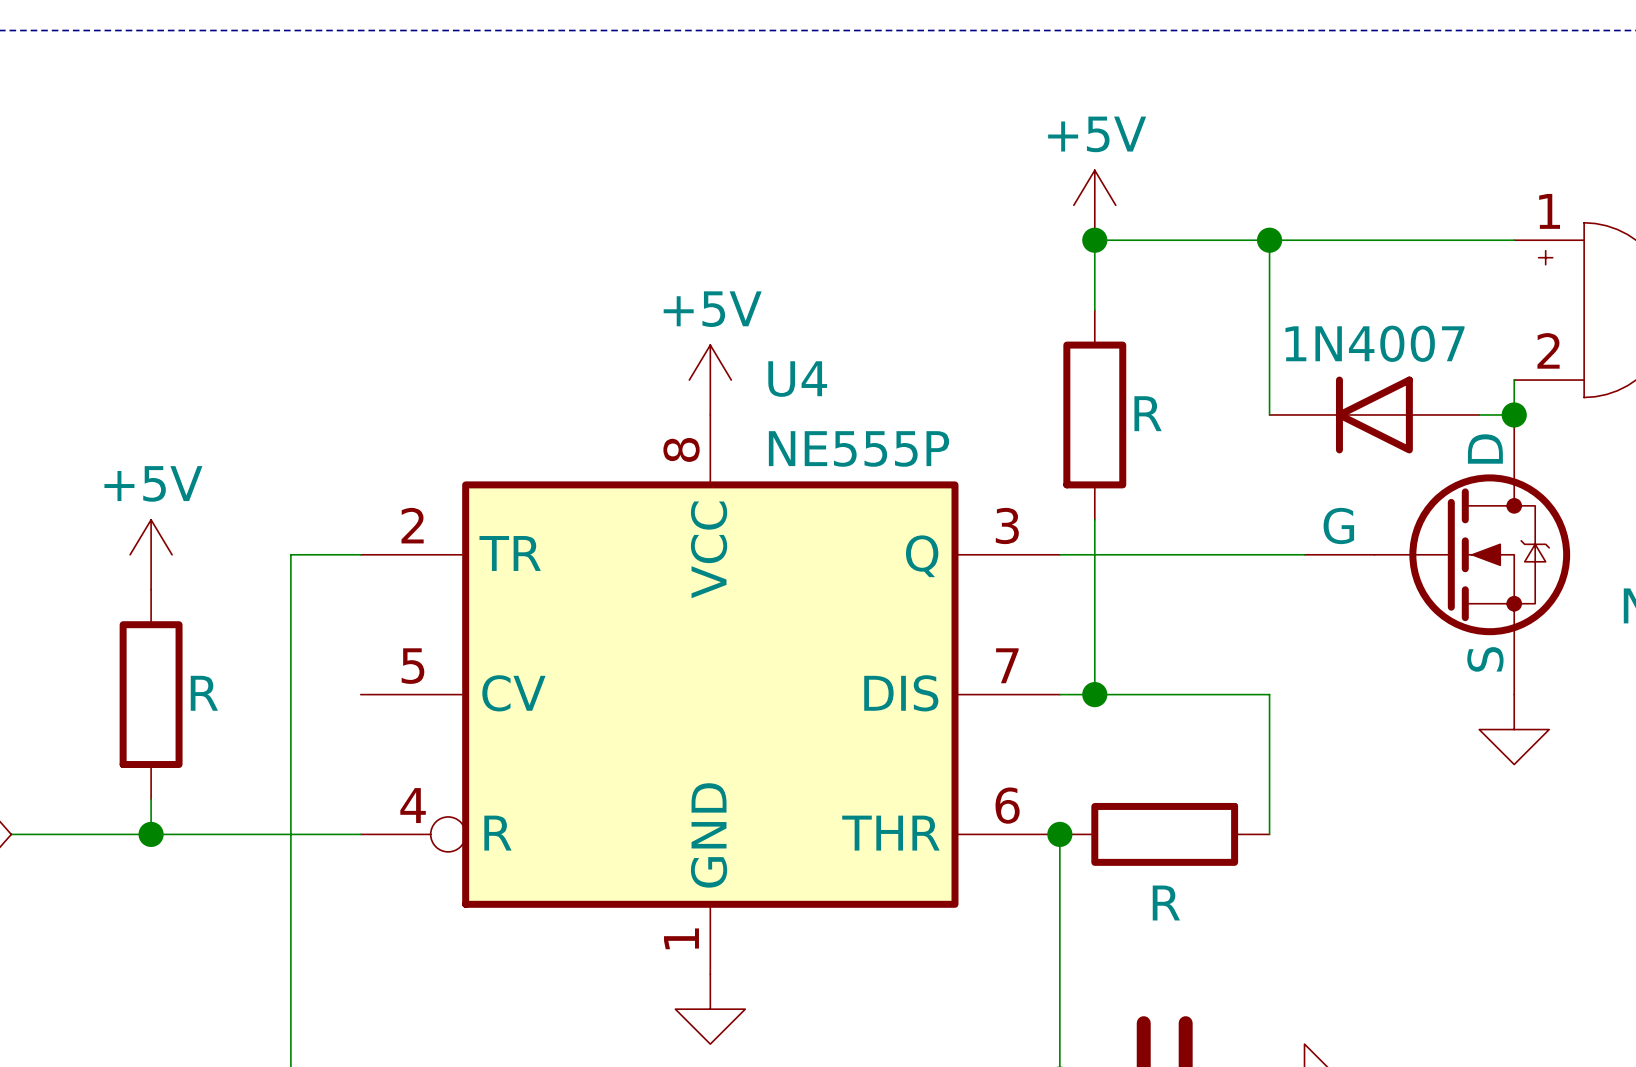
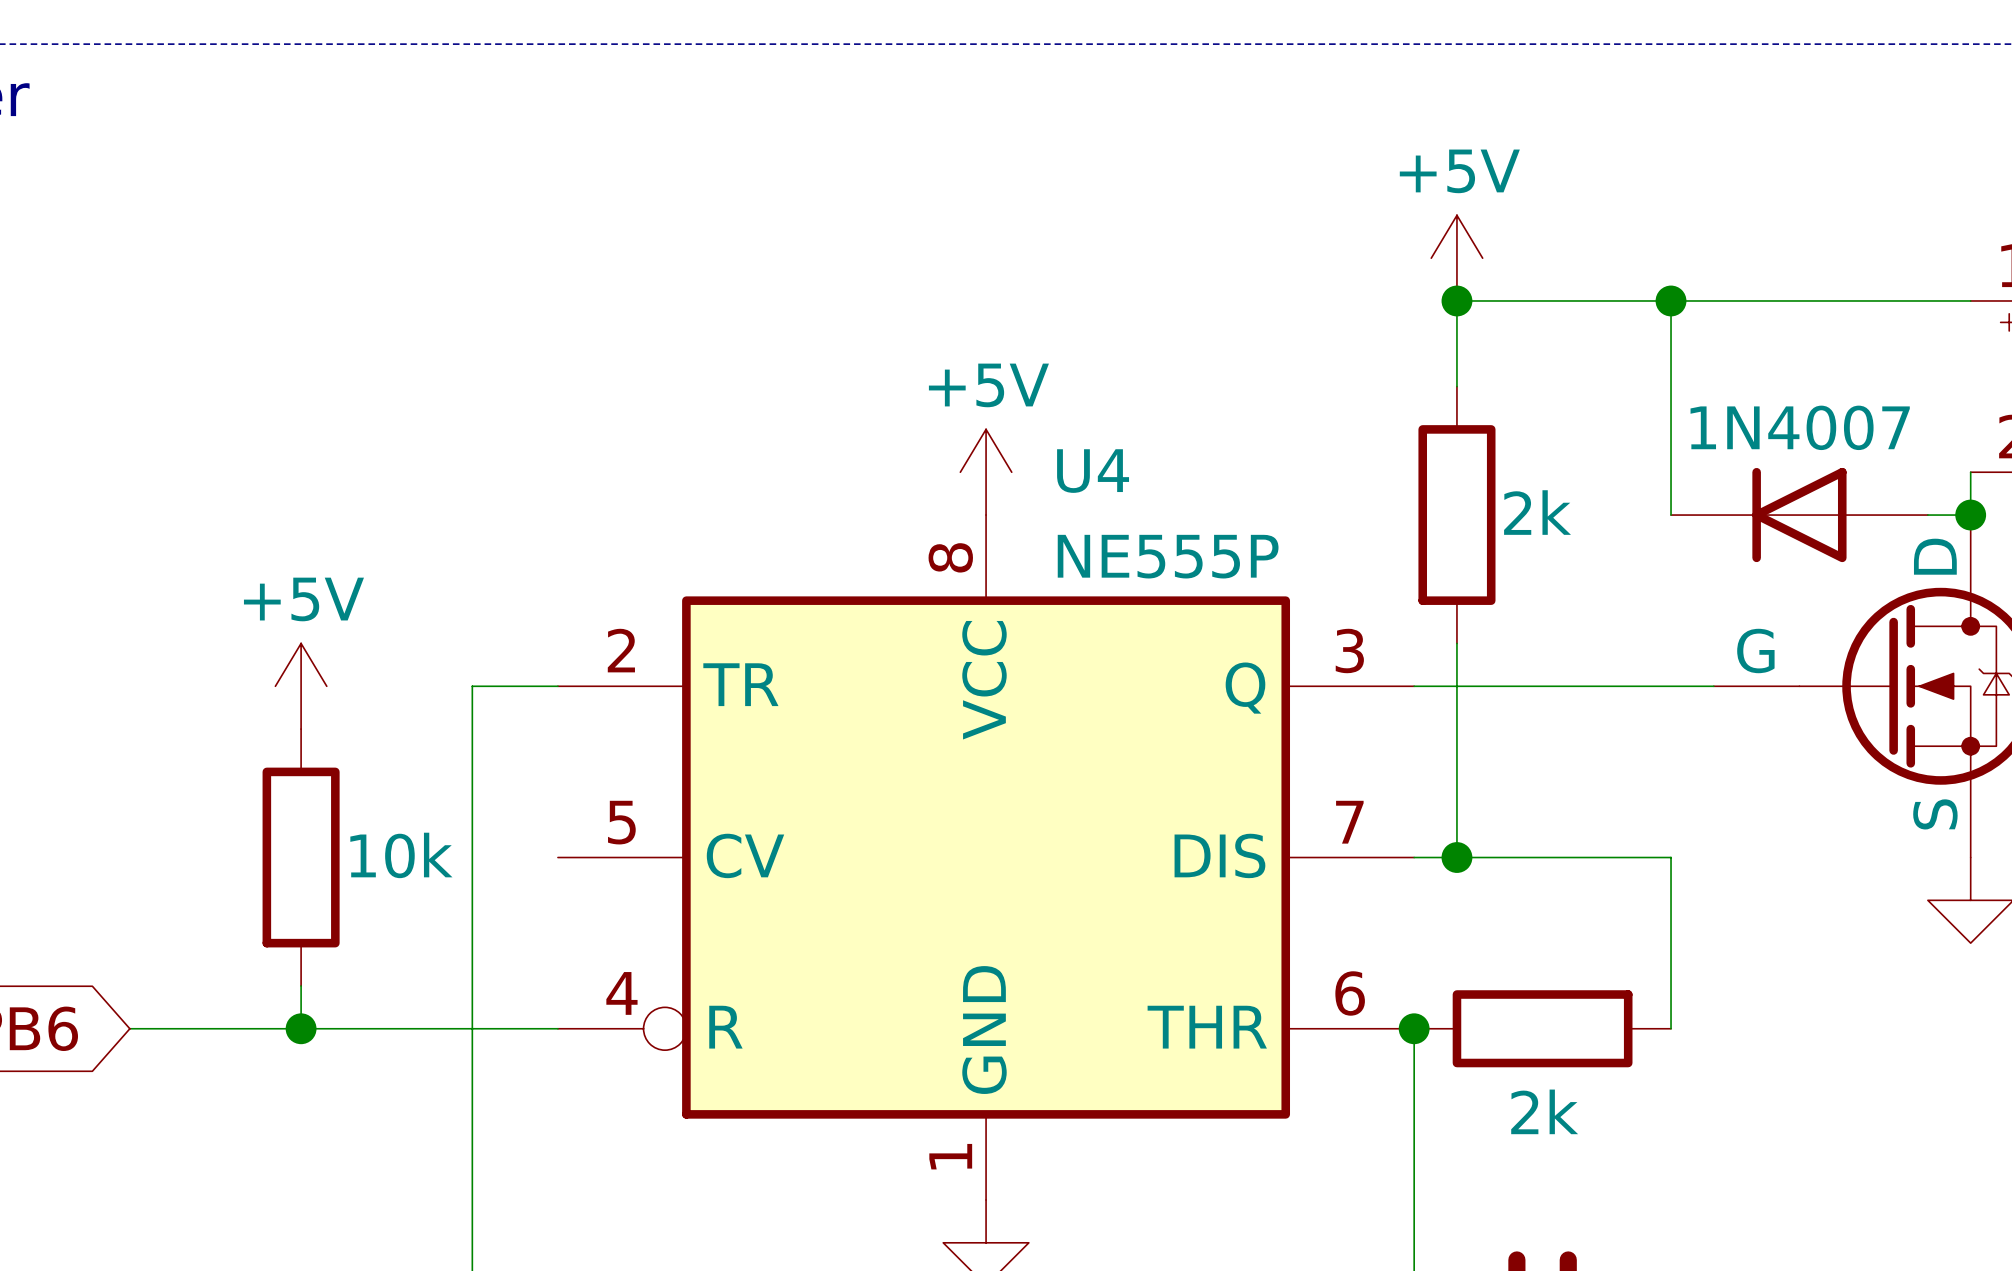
part value: R (1148, 413) -> 2k (1537, 512)
part value: R (204, 693) -> 10k (401, 855)
part value: R (1166, 903) -> 2k (1544, 1111)

